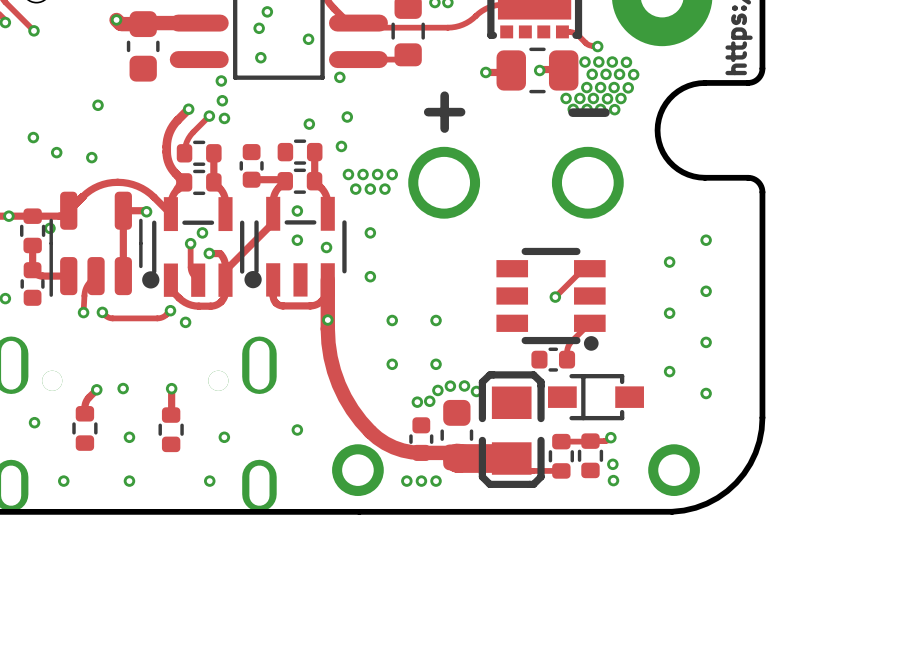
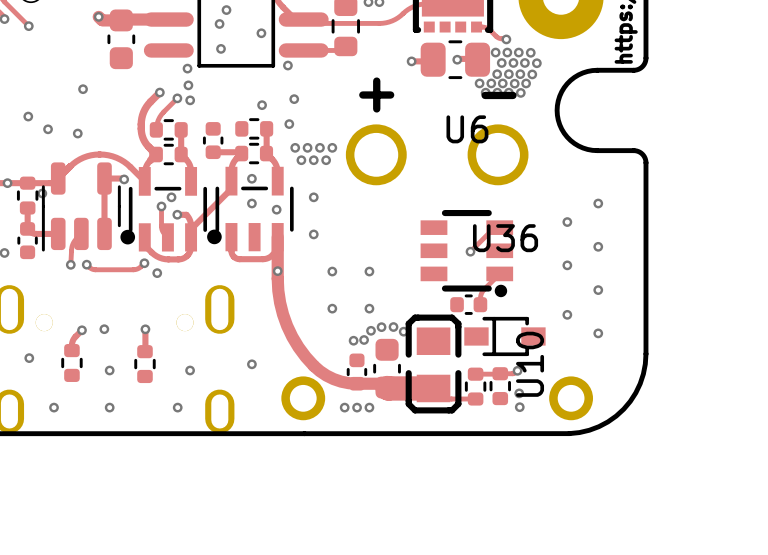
U6 name: none -> U6 (467, 129)
U36 name: none -> U36 (505, 238)
U10 name: none -> U10 (530, 364)

